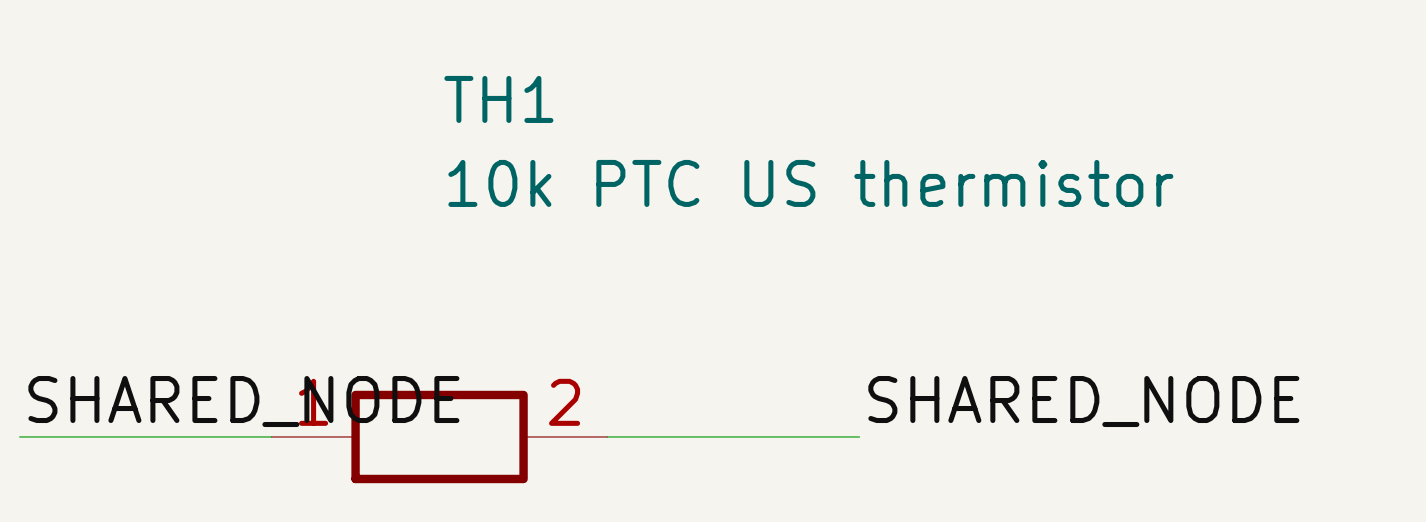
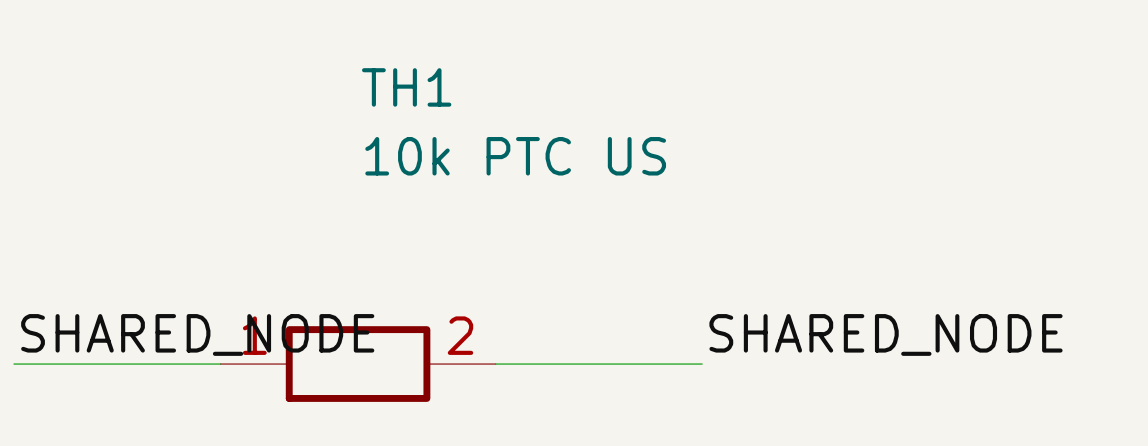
TH1 value: 10k PTC US thermistor (810, 183) -> 10k PTC US (515, 156)

